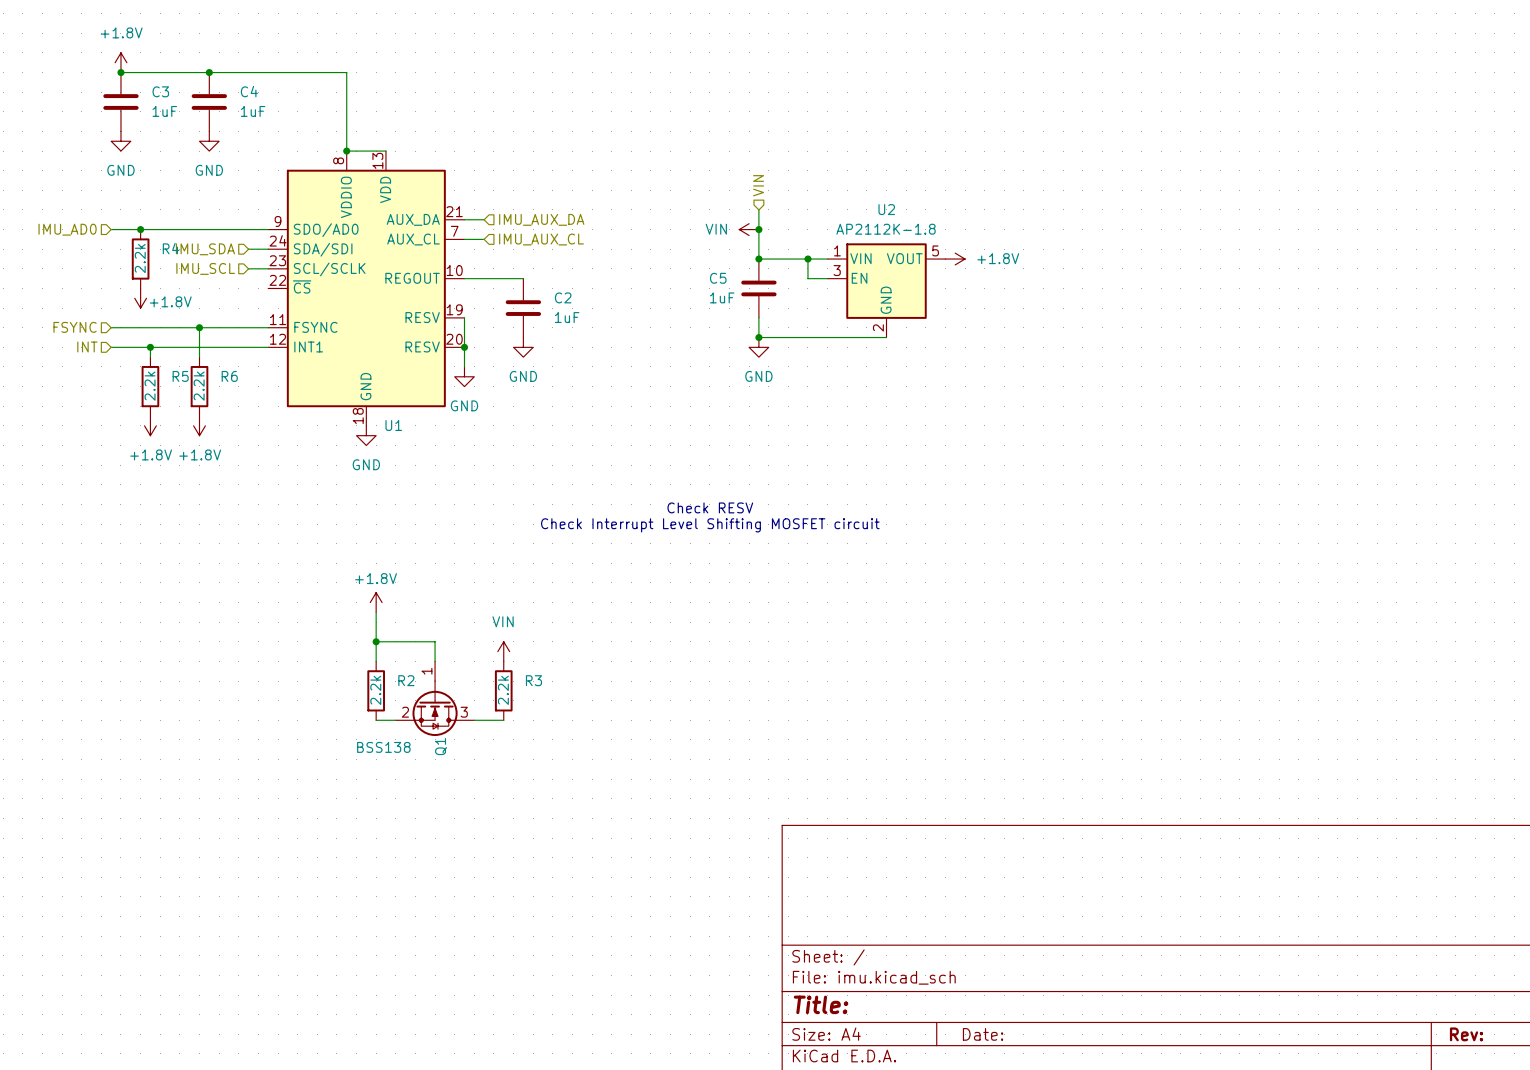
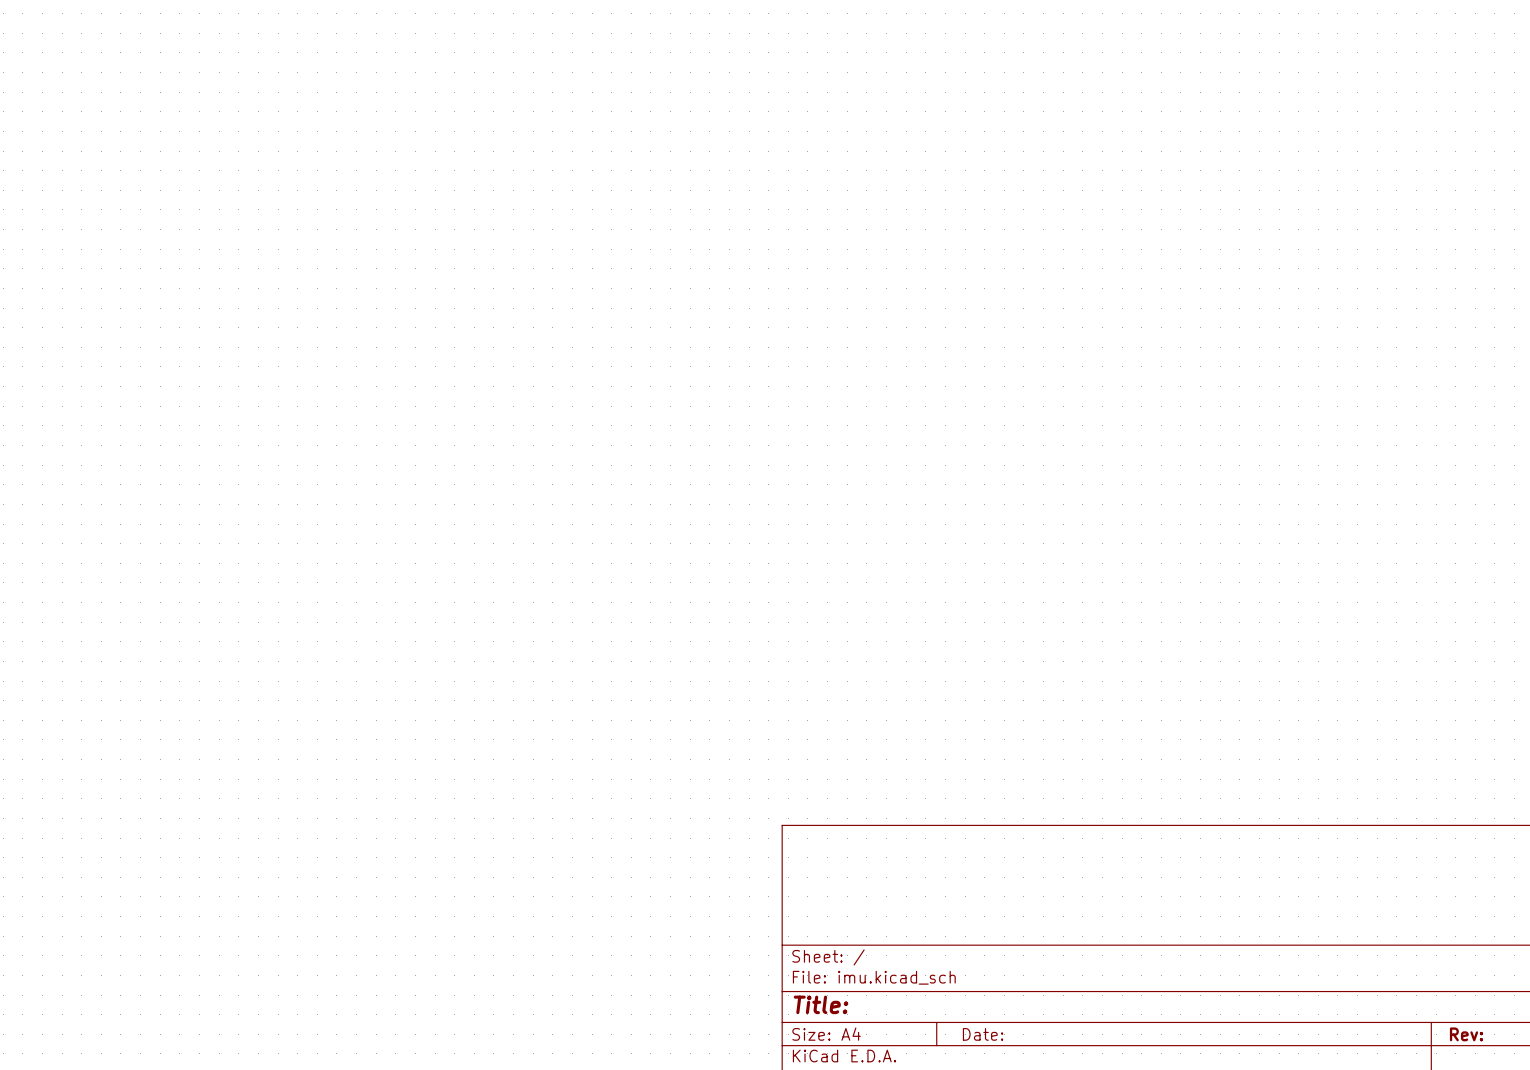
power symbol: +1.8V (120, 62) -> none
wire: (120, 72) (346, 72) (346, 151) (385, 151) -> none
junction: (120, 72) -> none
junction: (209, 72) -> none
C3: 1uF (120, 101) -> none
C4: 1uF (209, 101) -> none
power symbol: GND (120, 141) -> none
power symbol: GND (209, 141) -> none
junction: (346, 151) -> none
hierarchical label: VIN (758, 185) -> none
wire: (758, 209) (758, 259) (827, 259) -> none
wire: (464, 219) (484, 219) -> none
hierarchical label: IMU_AUX_DA (541, 219) -> none
hierarchical label: IMU_AD0 (67, 229) -> none
wire: (111, 229) (268, 229) -> none
junction: (140, 229) -> none
power symbol: VIN (749, 229) -> none
junction: (758, 229) -> none
wire: (464, 239) (484, 239) -> none
hierarchical label: IMU_AUX_CL (541, 239) -> none
hierarchical label: IMU_SDA (205, 249) -> none
wire: (248, 249) (268, 249) -> none
R4: 2.2k (140, 259) -> none
junction: (758, 259) -> none
wire: (807, 259) (807, 278) (827, 278) -> none
junction: (807, 259) -> none
power symbol: +1.8V (955, 259) -> none
hierarchical label: IMU_SCL (205, 268) -> none
wire: (248, 268) (268, 268) -> none
wire: (464, 278) (523, 278) -> none
U1: (366, 288) -> none
C5: 1uF (758, 288) -> none
U2: AP2112K-1.8 (886, 290) -> none
power symbol: +1.8V (140, 298) -> none
C2: 1uF (523, 308) -> none
wire: (464, 317) (464, 366) -> none
wire: (758, 317) (758, 337) (886, 337) -> none
hierarchical label: FSYNC (75, 327) -> none
wire: (111, 327) (268, 327) -> none
wire: (199, 327) (199, 357) -> none
junction: (199, 327) -> none
junction: (758, 337) -> none
hierarchical label: INT (87, 346) -> none
wire: (111, 347) (268, 347) -> none
wire: (150, 347) (150, 357) -> none
junction: (150, 347) -> none
junction: (464, 347) -> none
power symbol: GND (523, 347) -> none
power symbol: GND (758, 347) -> none
power symbol: GND (464, 376) -> none
R5: 2.2k (150, 386) -> none
R6: 2.2k (199, 386) -> none
power symbol: +1.8V (150, 425) -> none
power symbol: +1.8V (199, 425) -> none
power symbol: GND (366, 435) -> none
text: Check RESV (710, 507) -> none
text: Check Interrupt Level Shifting MOSFET circuit (710, 525) -> none
power symbol: +1.8V (376, 602) -> none
wire: (376, 612) (376, 661) -> none
wire: (376, 641) (435, 641) (435, 661) -> none
junction: (376, 641) -> none
power symbol: VIN (503, 651) -> none
R2: 2.2k (376, 690) -> none
R3: 2.2k (503, 690) -> none
Q1: BSS138 (435, 698) -> none
wire: (376, 720) (395, 720) -> none
wire: (474, 720) (503, 720) -> none

